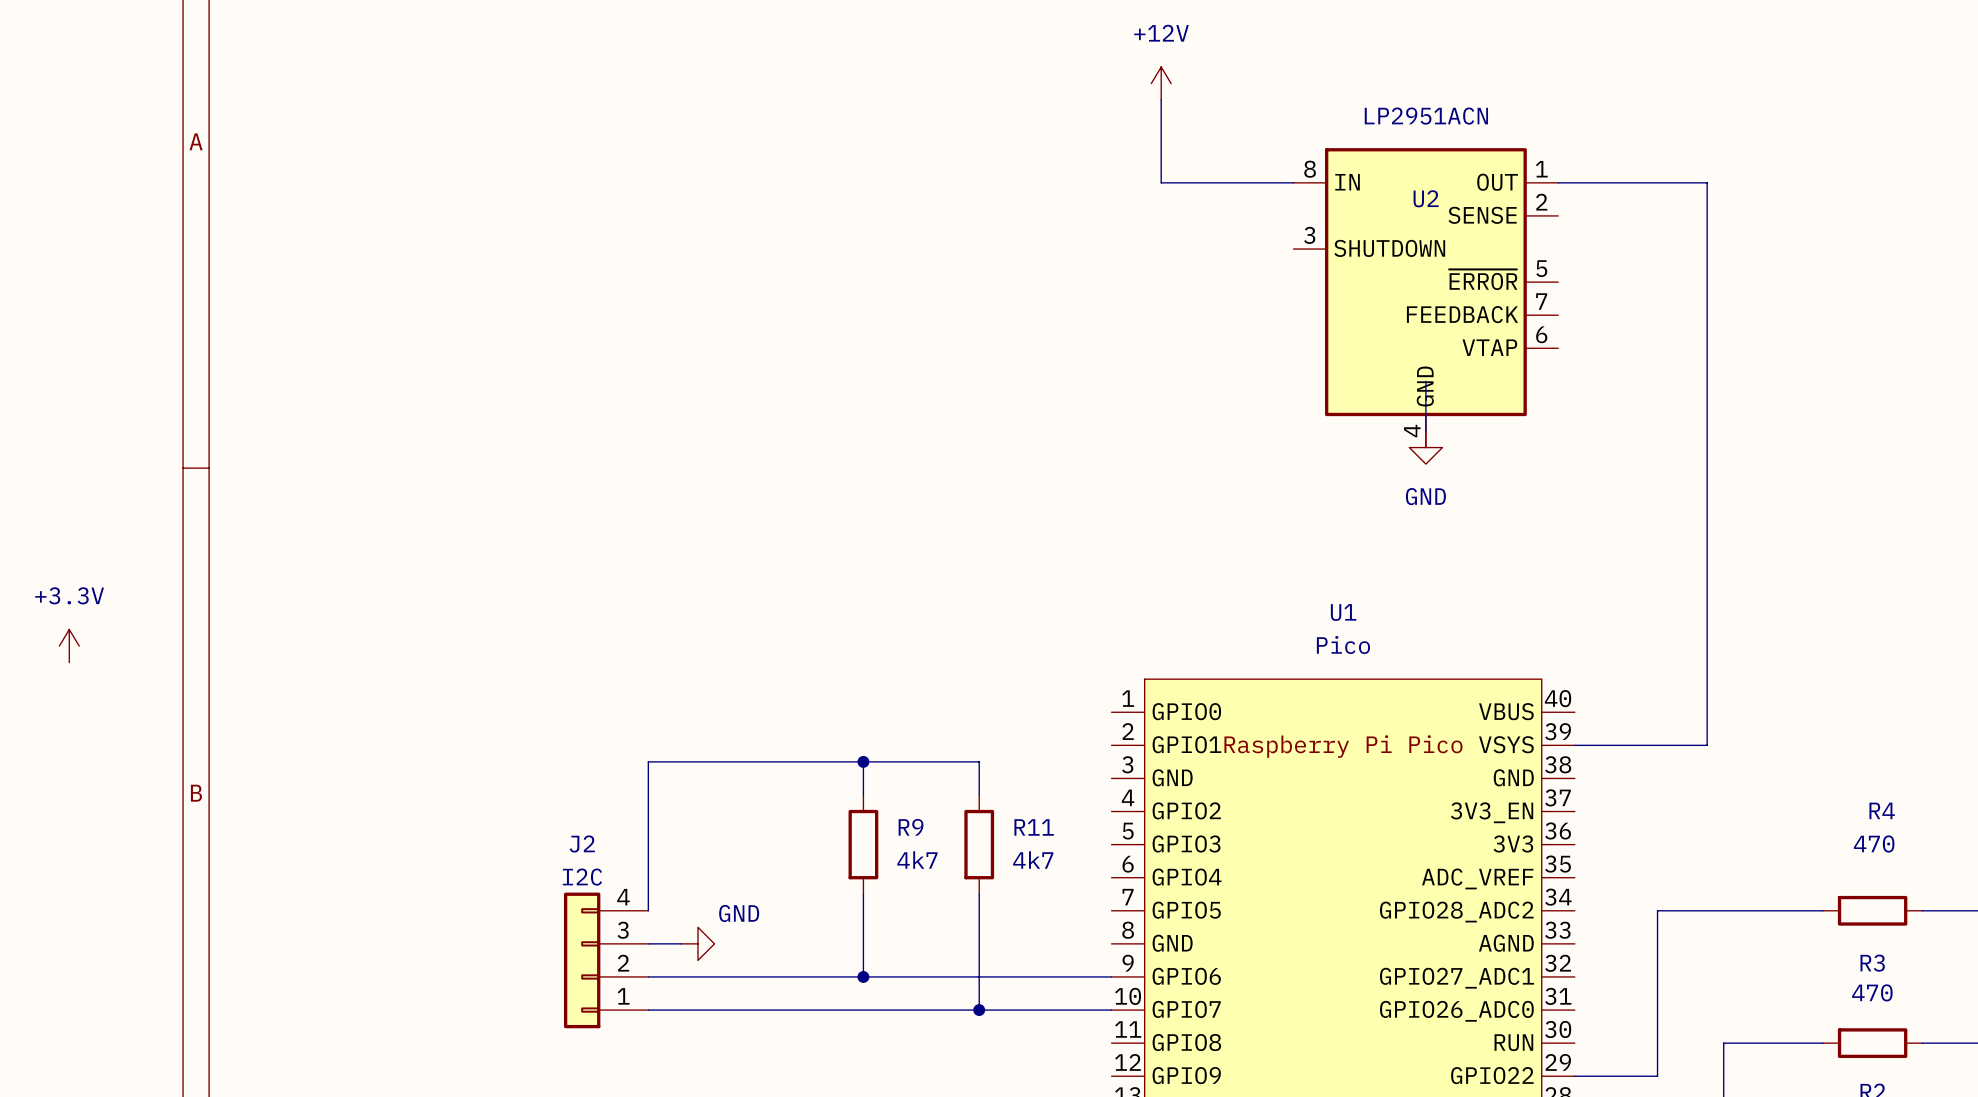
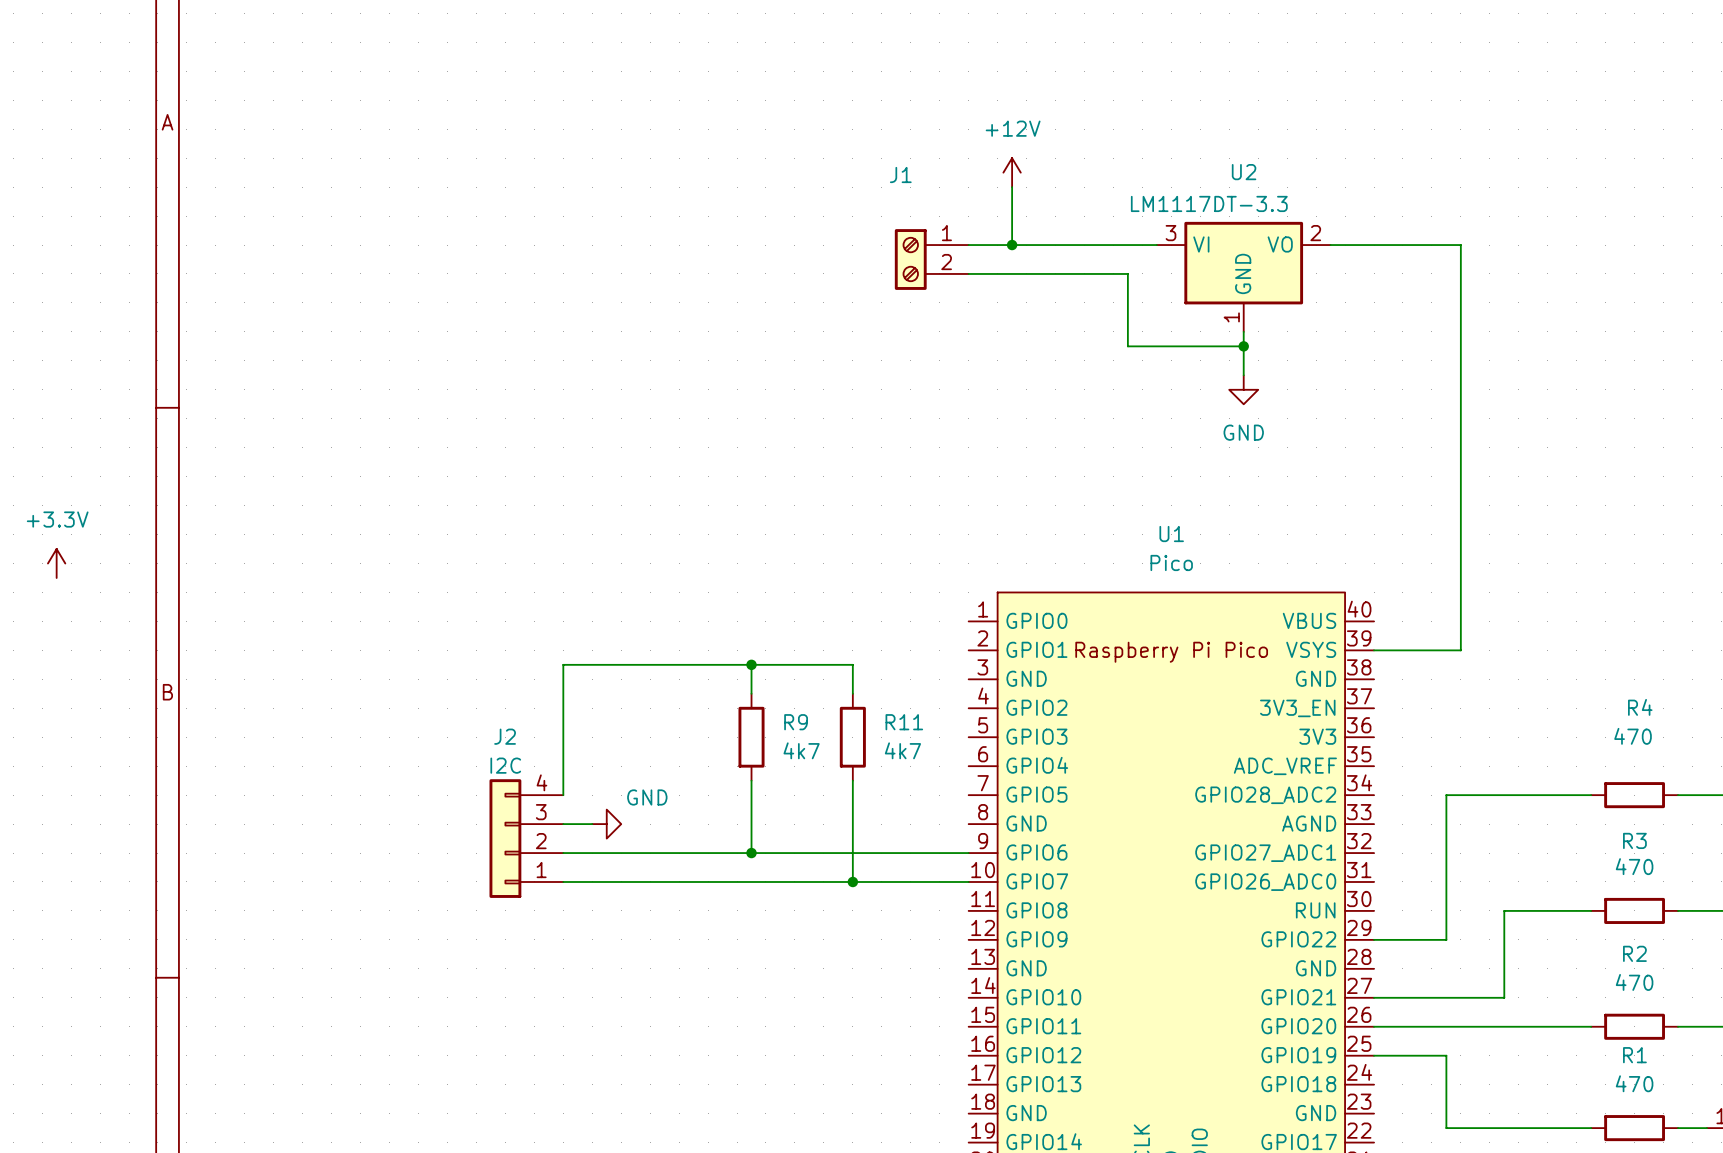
power symbol position: +12V (1161, 83) -> +12V (1012, 172)
wire: (1161, 100) (1161, 182) (1293, 182) -> none
U2 value: LP2951ACN (1426, 116) -> LM1117DT-3.3 (1209, 203)
U2 symbol: [1293, 148, 1559, 448] -> [1156, 221, 1331, 332]
wire: (1558, 182) (1707, 182) (1707, 745) (1674, 745) -> (1330, 245) (1460, 245) (1460, 650)
wire: none -> (1012, 187) (1012, 245)
wire: none -> (968, 245) (1156, 245)
junction: none -> (1012, 245)
J1: none -> (931, 259)
wire: none -> (968, 273) (1127, 273) (1127, 346) (1243, 346)
junction: none -> (1243, 346)

